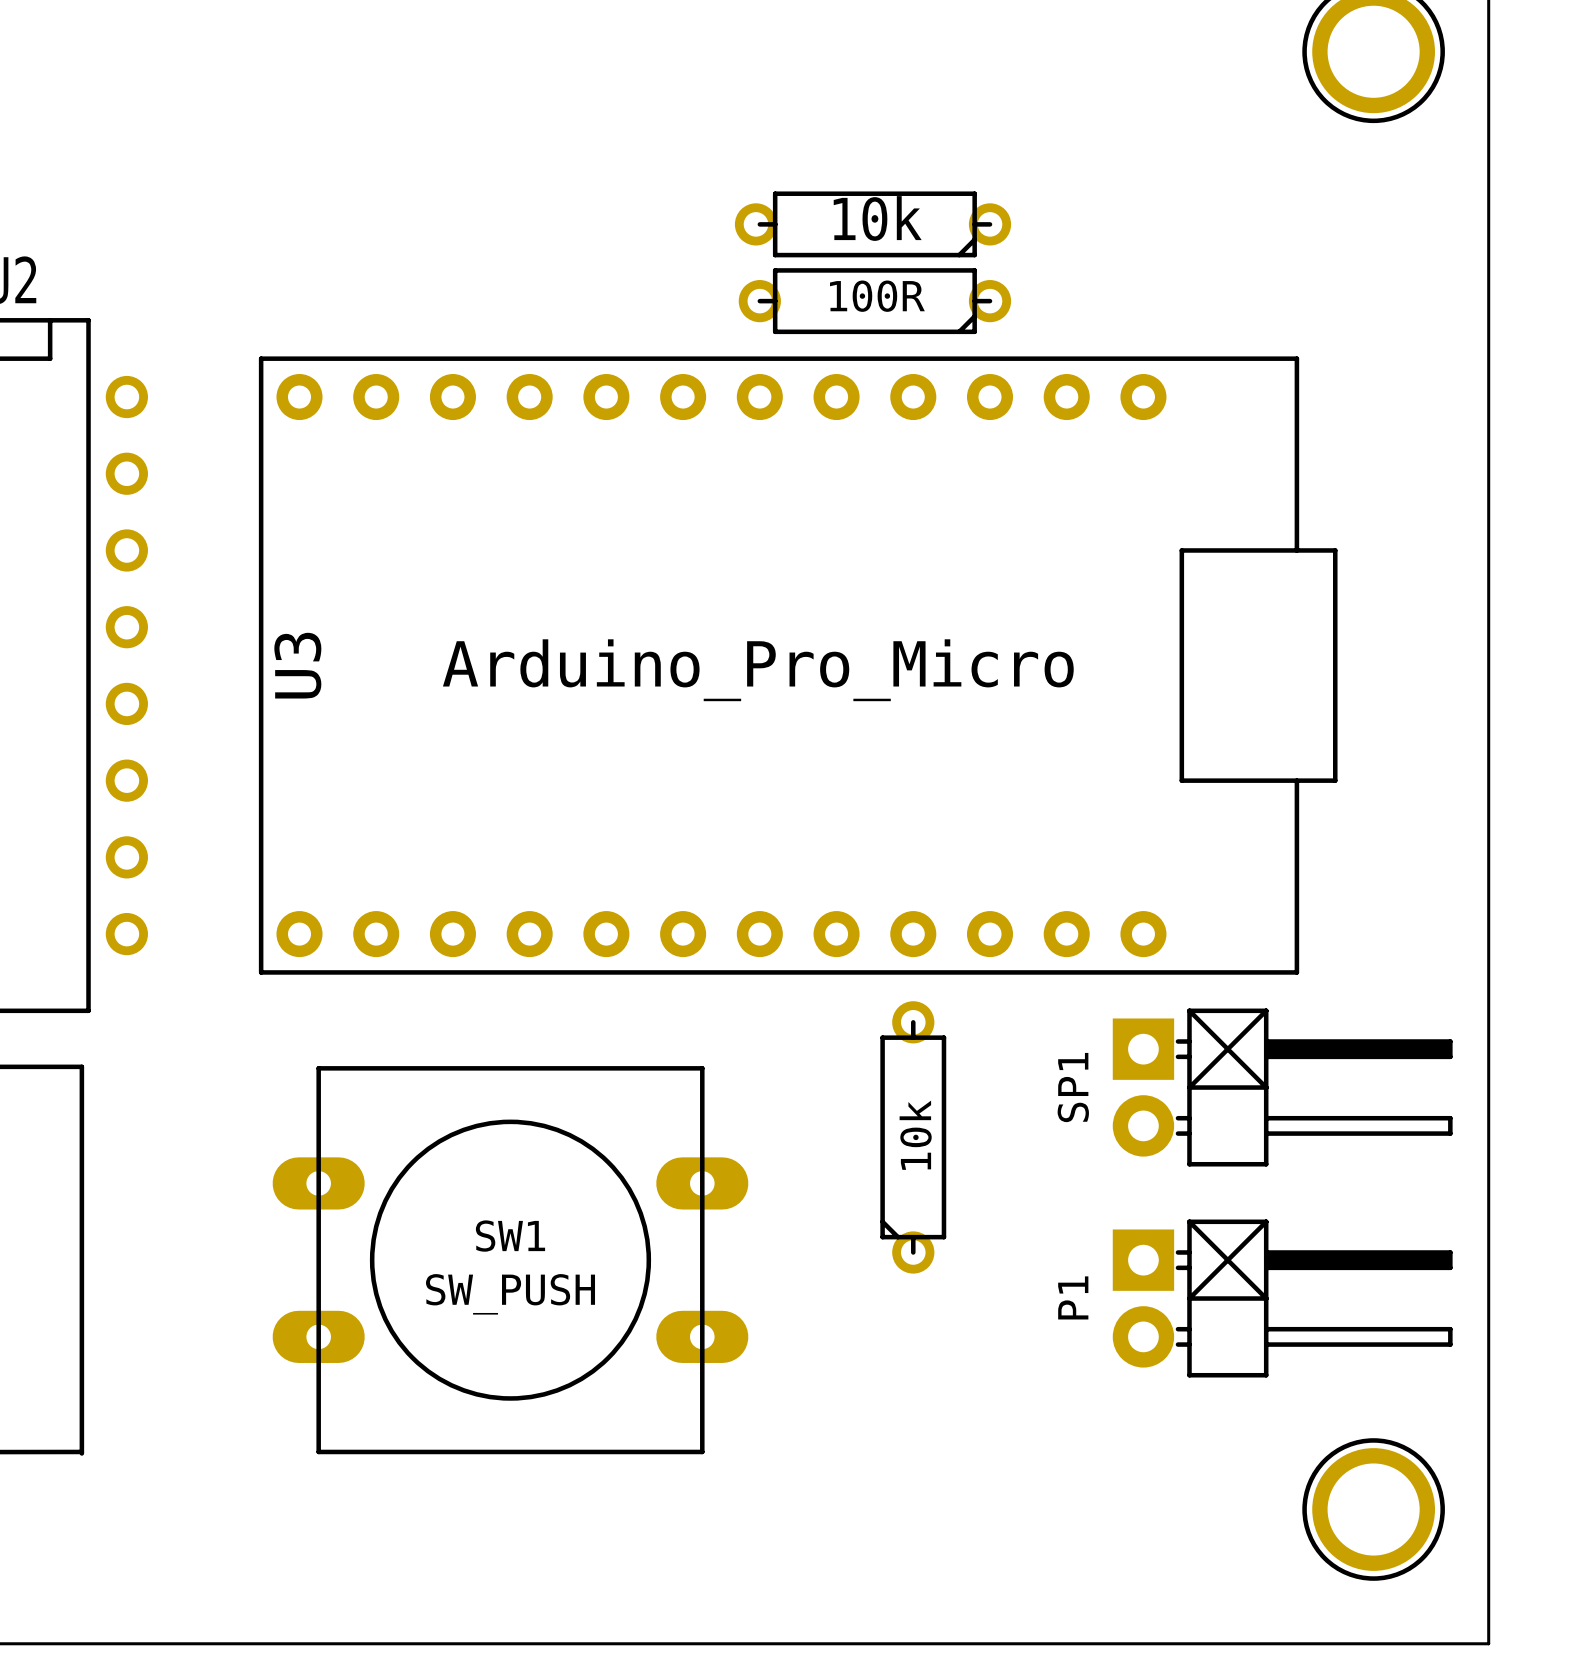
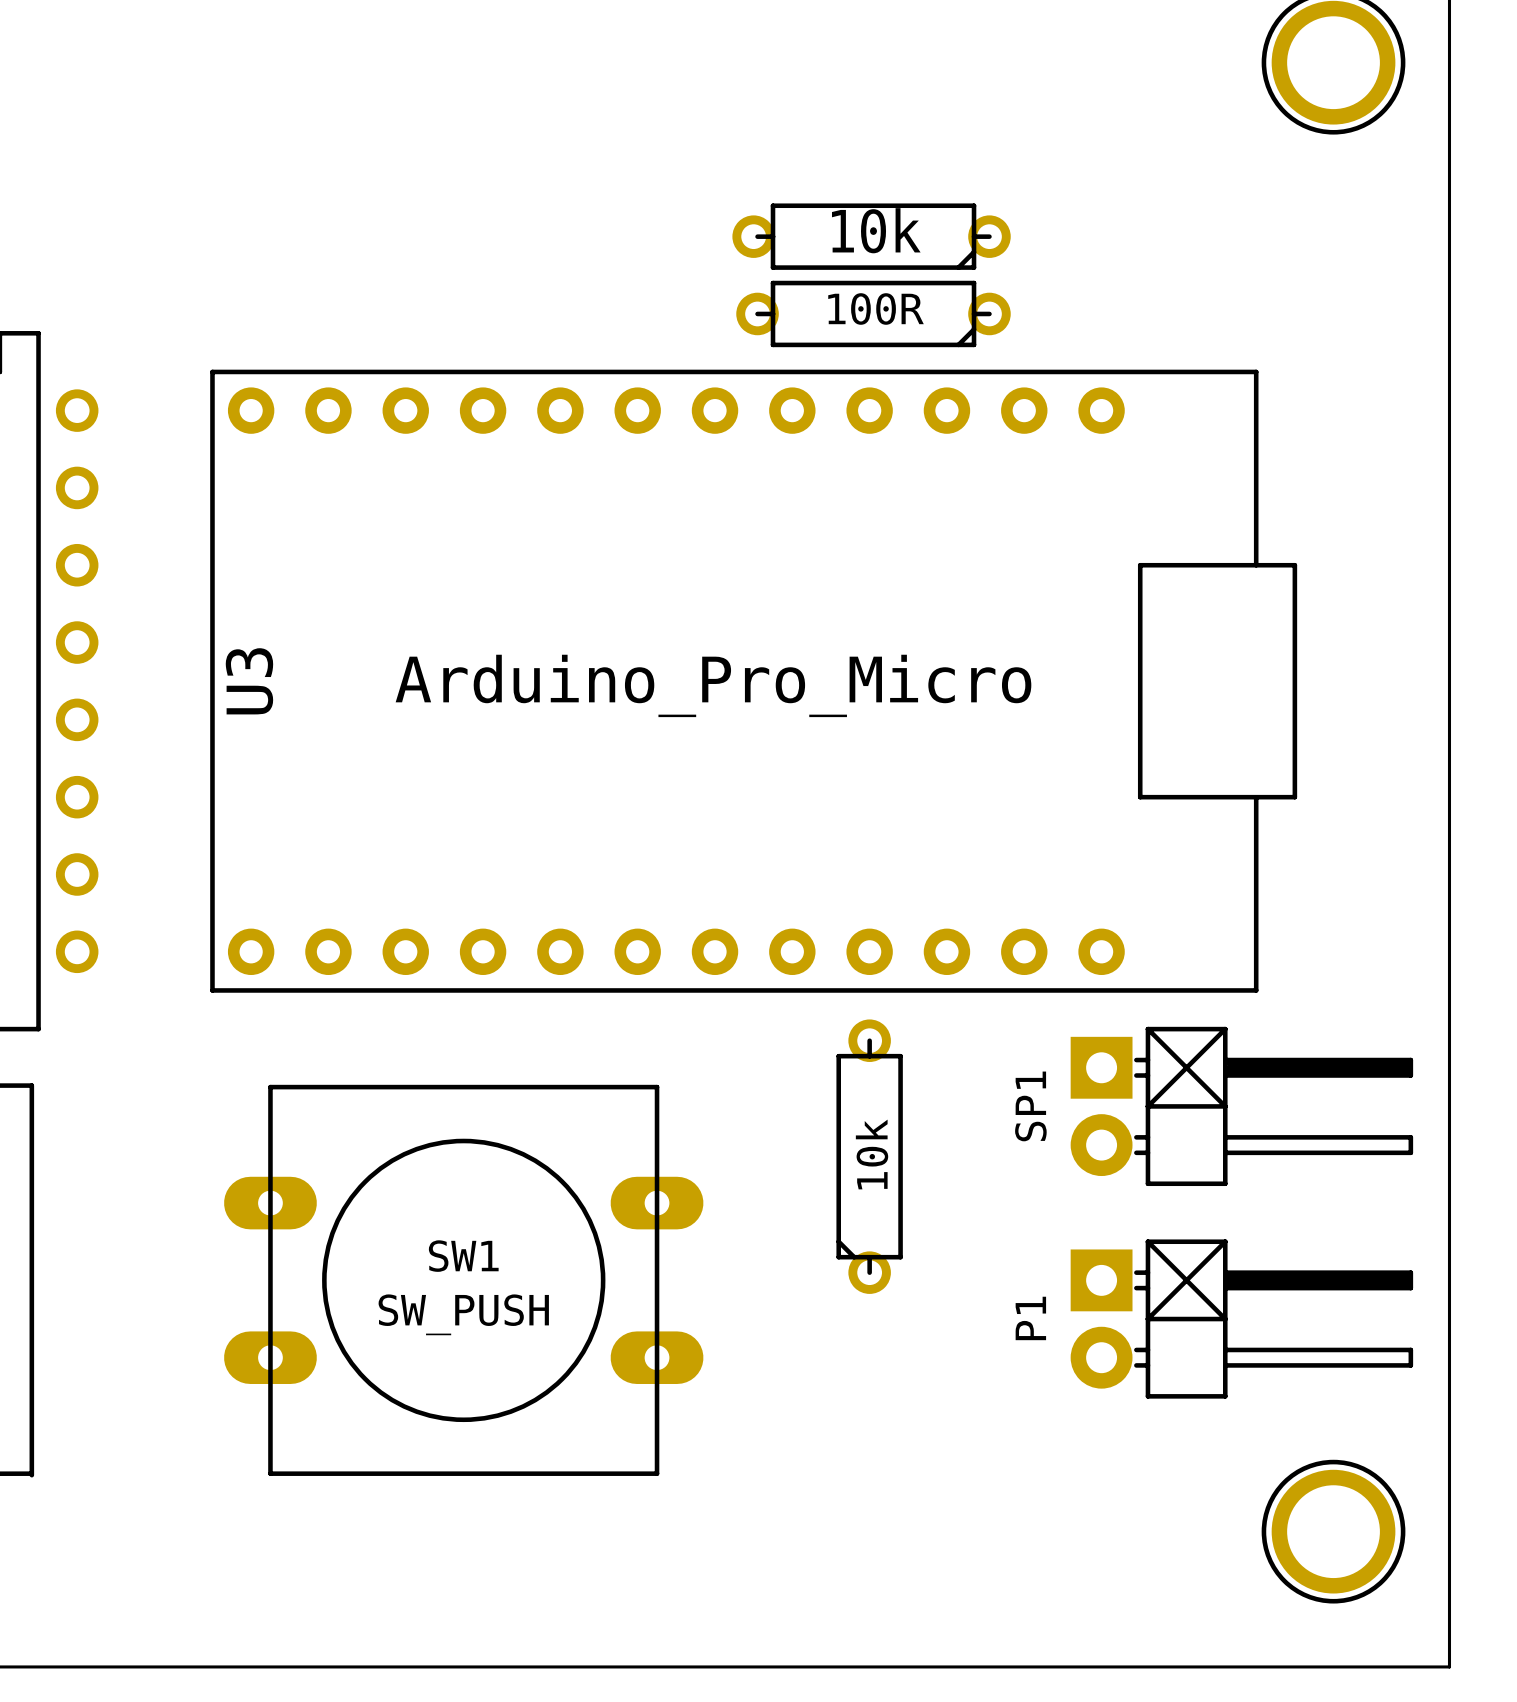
part position: (873, 224) -> (871, 236)
part position: (874, 301) -> (873, 313)

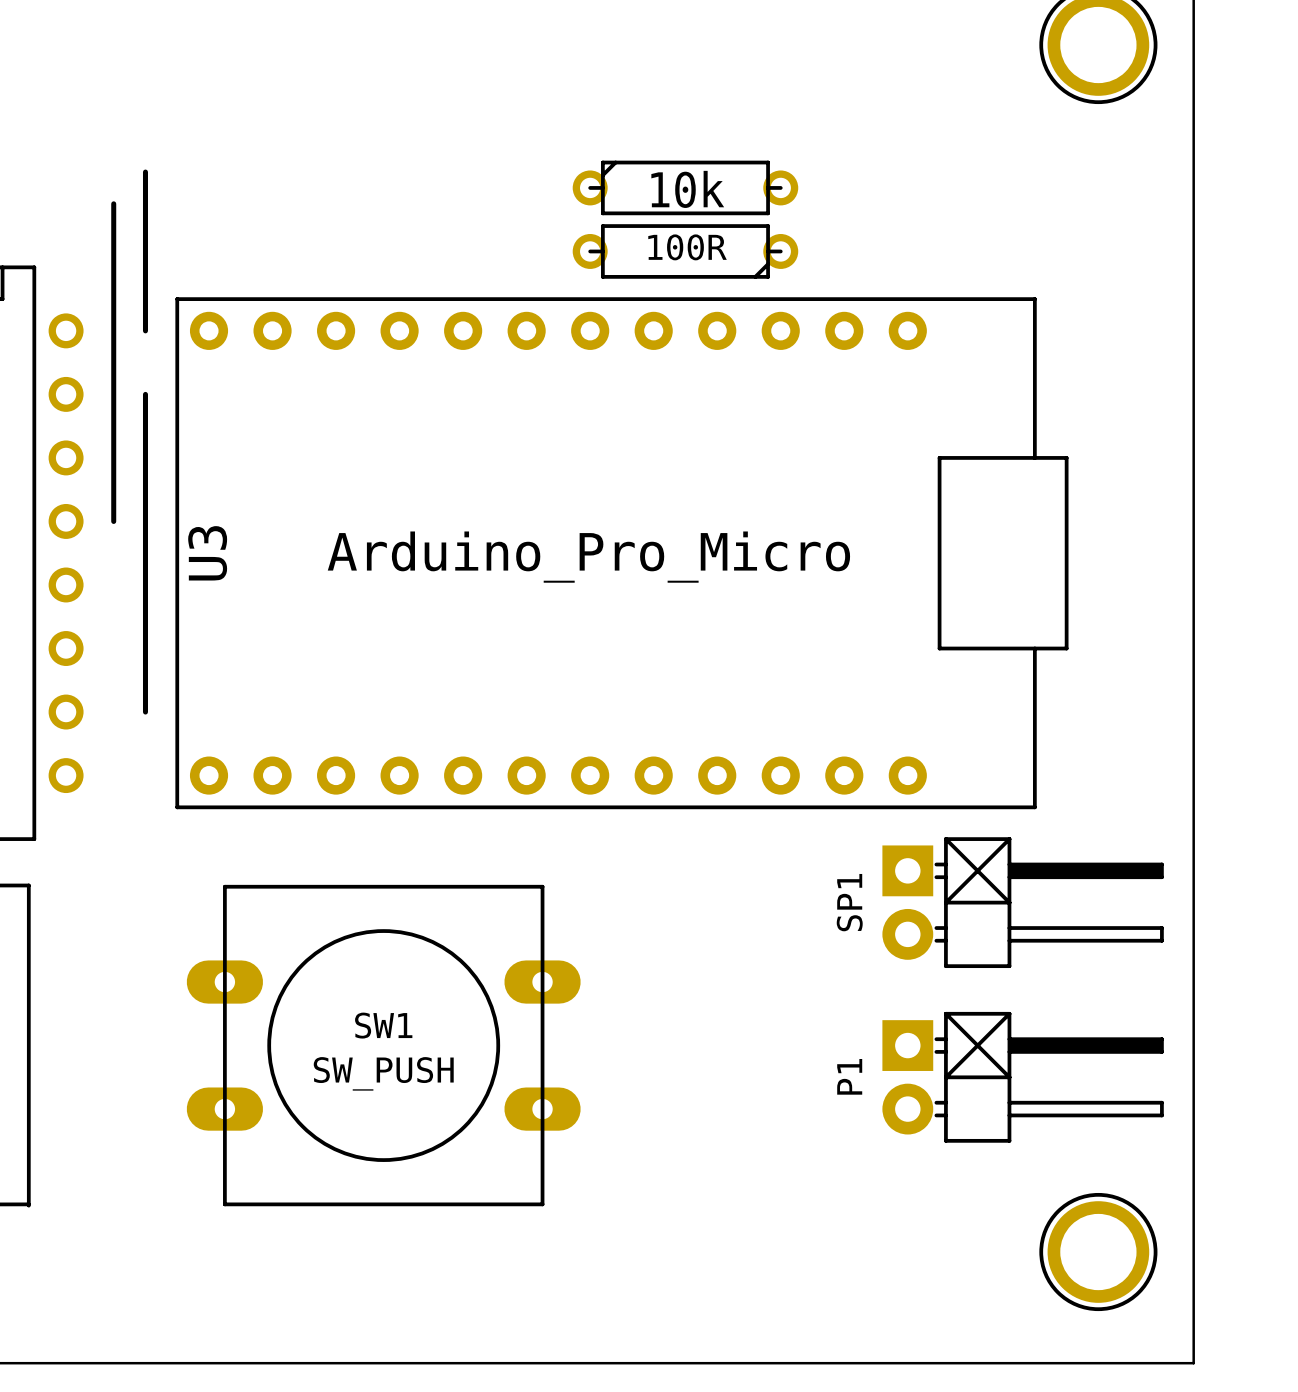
line: none -> (145, 172) (145, 330)
part: none -> 10k (685, 187)
part: 10k (871, 236) -> none
line: none -> (113, 203) (113, 521)
part position: (873, 313) -> (685, 251)
line: none -> (145, 394) (145, 712)
part: 10k (869, 1156) -> none

